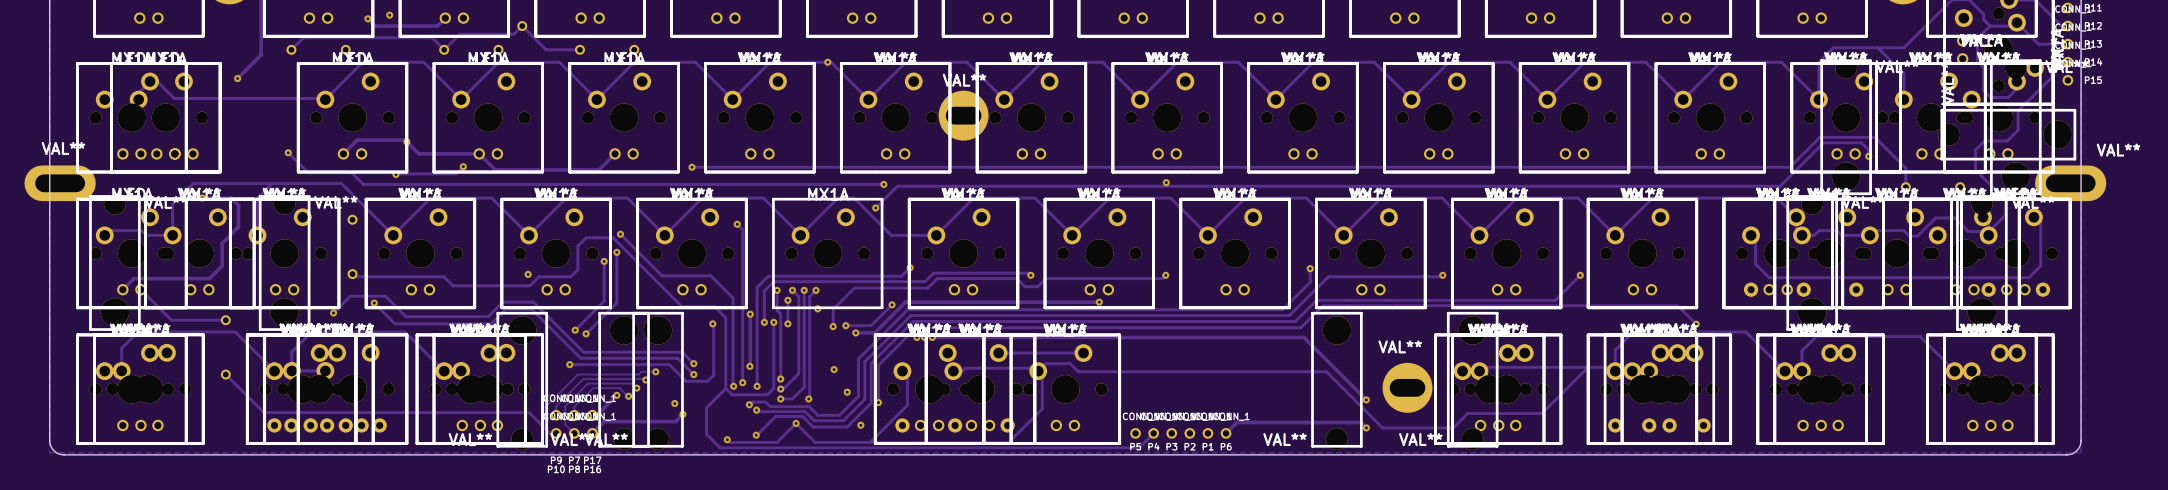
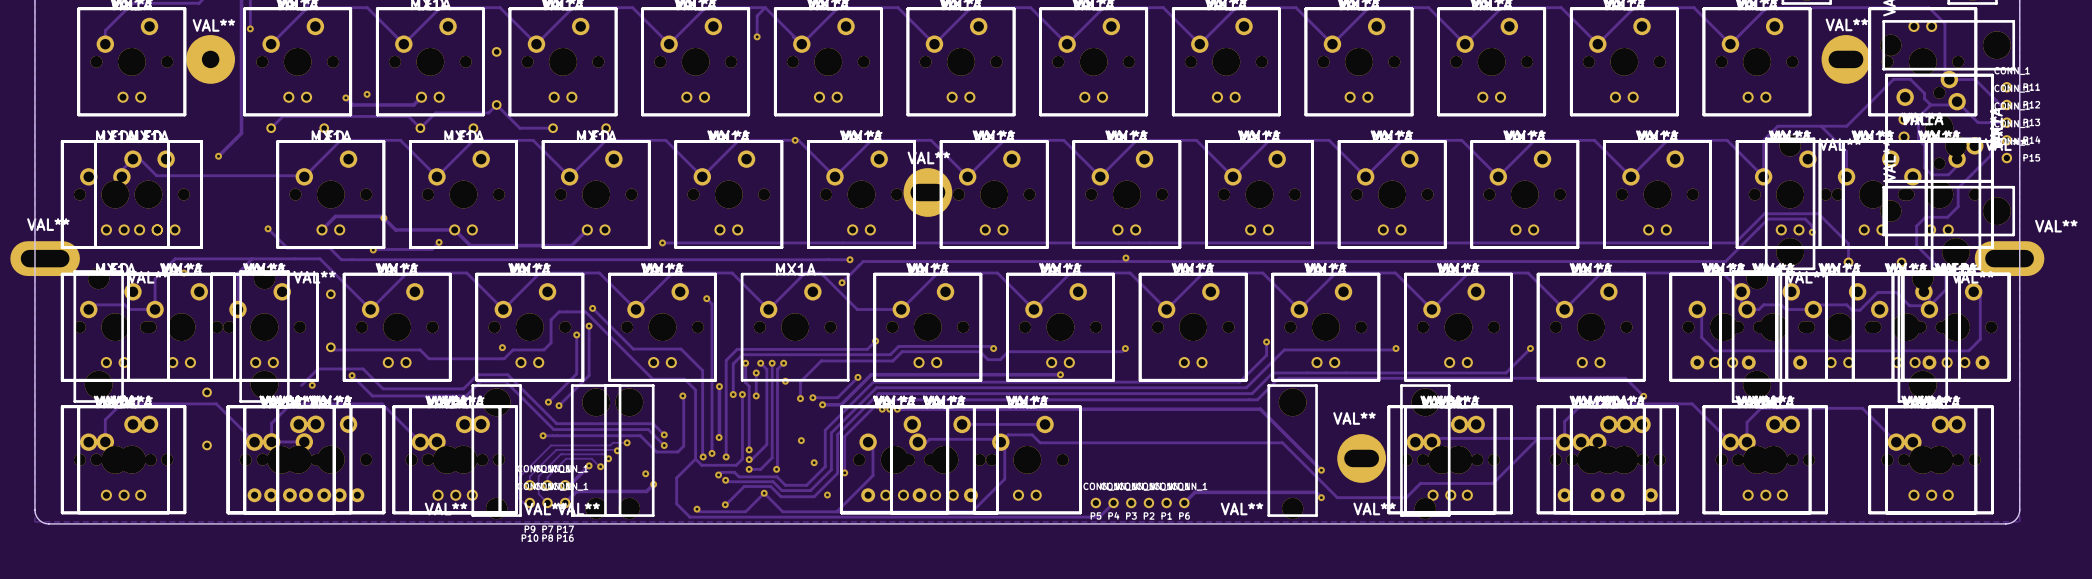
track: (202, 198) (231, 198) (238, 205) (238, 227) (222, 243) (222, 265) (209, 278) (133, 278) (122, 289) -> none
track: (140, 289) (171, 320) (225, 320) -> none
track: none -> (318, 368) (301, 385)
track: (350, 296) (333, 312) -> (328, 368) (318, 368)
track: (225, 374) (263, 412) (529, 412) (549, 433) -> none

